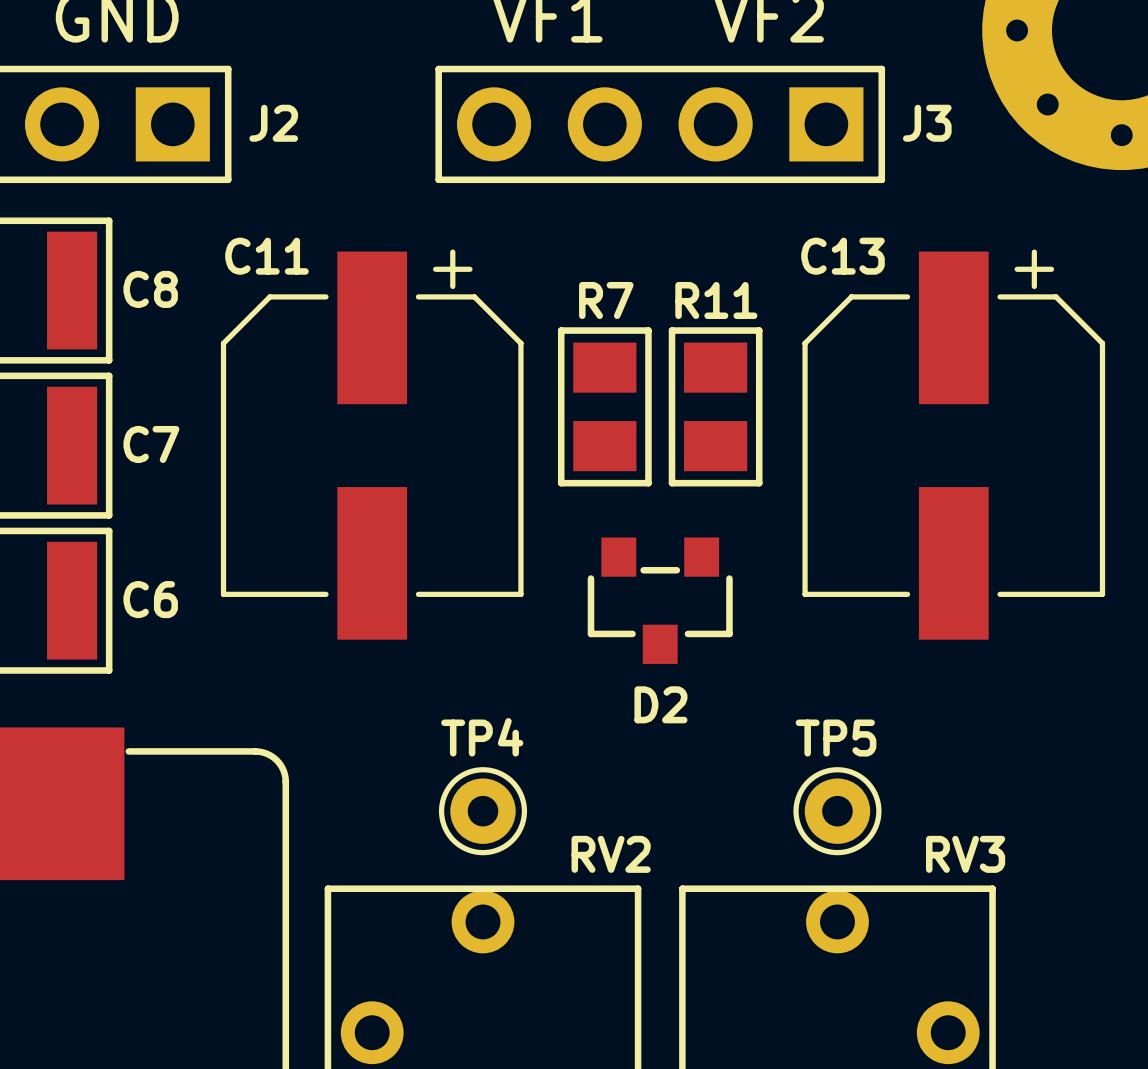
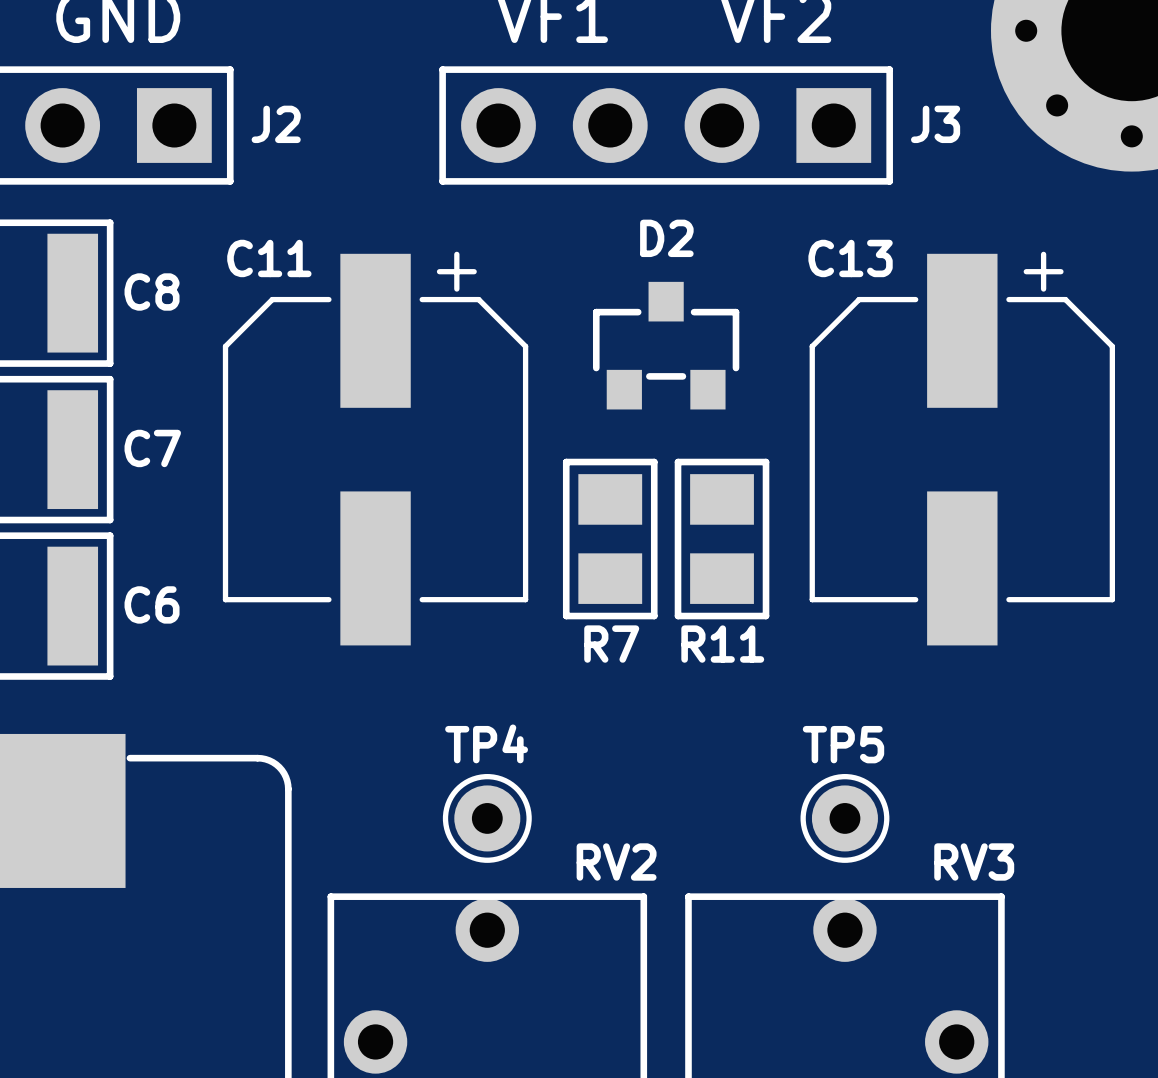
R7 name position: R7 (606, 300) -> R7 (611, 644)
R11 name position: R11 (716, 300) -> R11 (722, 644)
R7 position: (604, 406) -> (610, 539)
R11 position: (715, 406) -> (722, 539)
D2 rotation: 0° (660, 600) -> 180° (666, 345)
D2 position: (660, 600) -> (666, 345)

